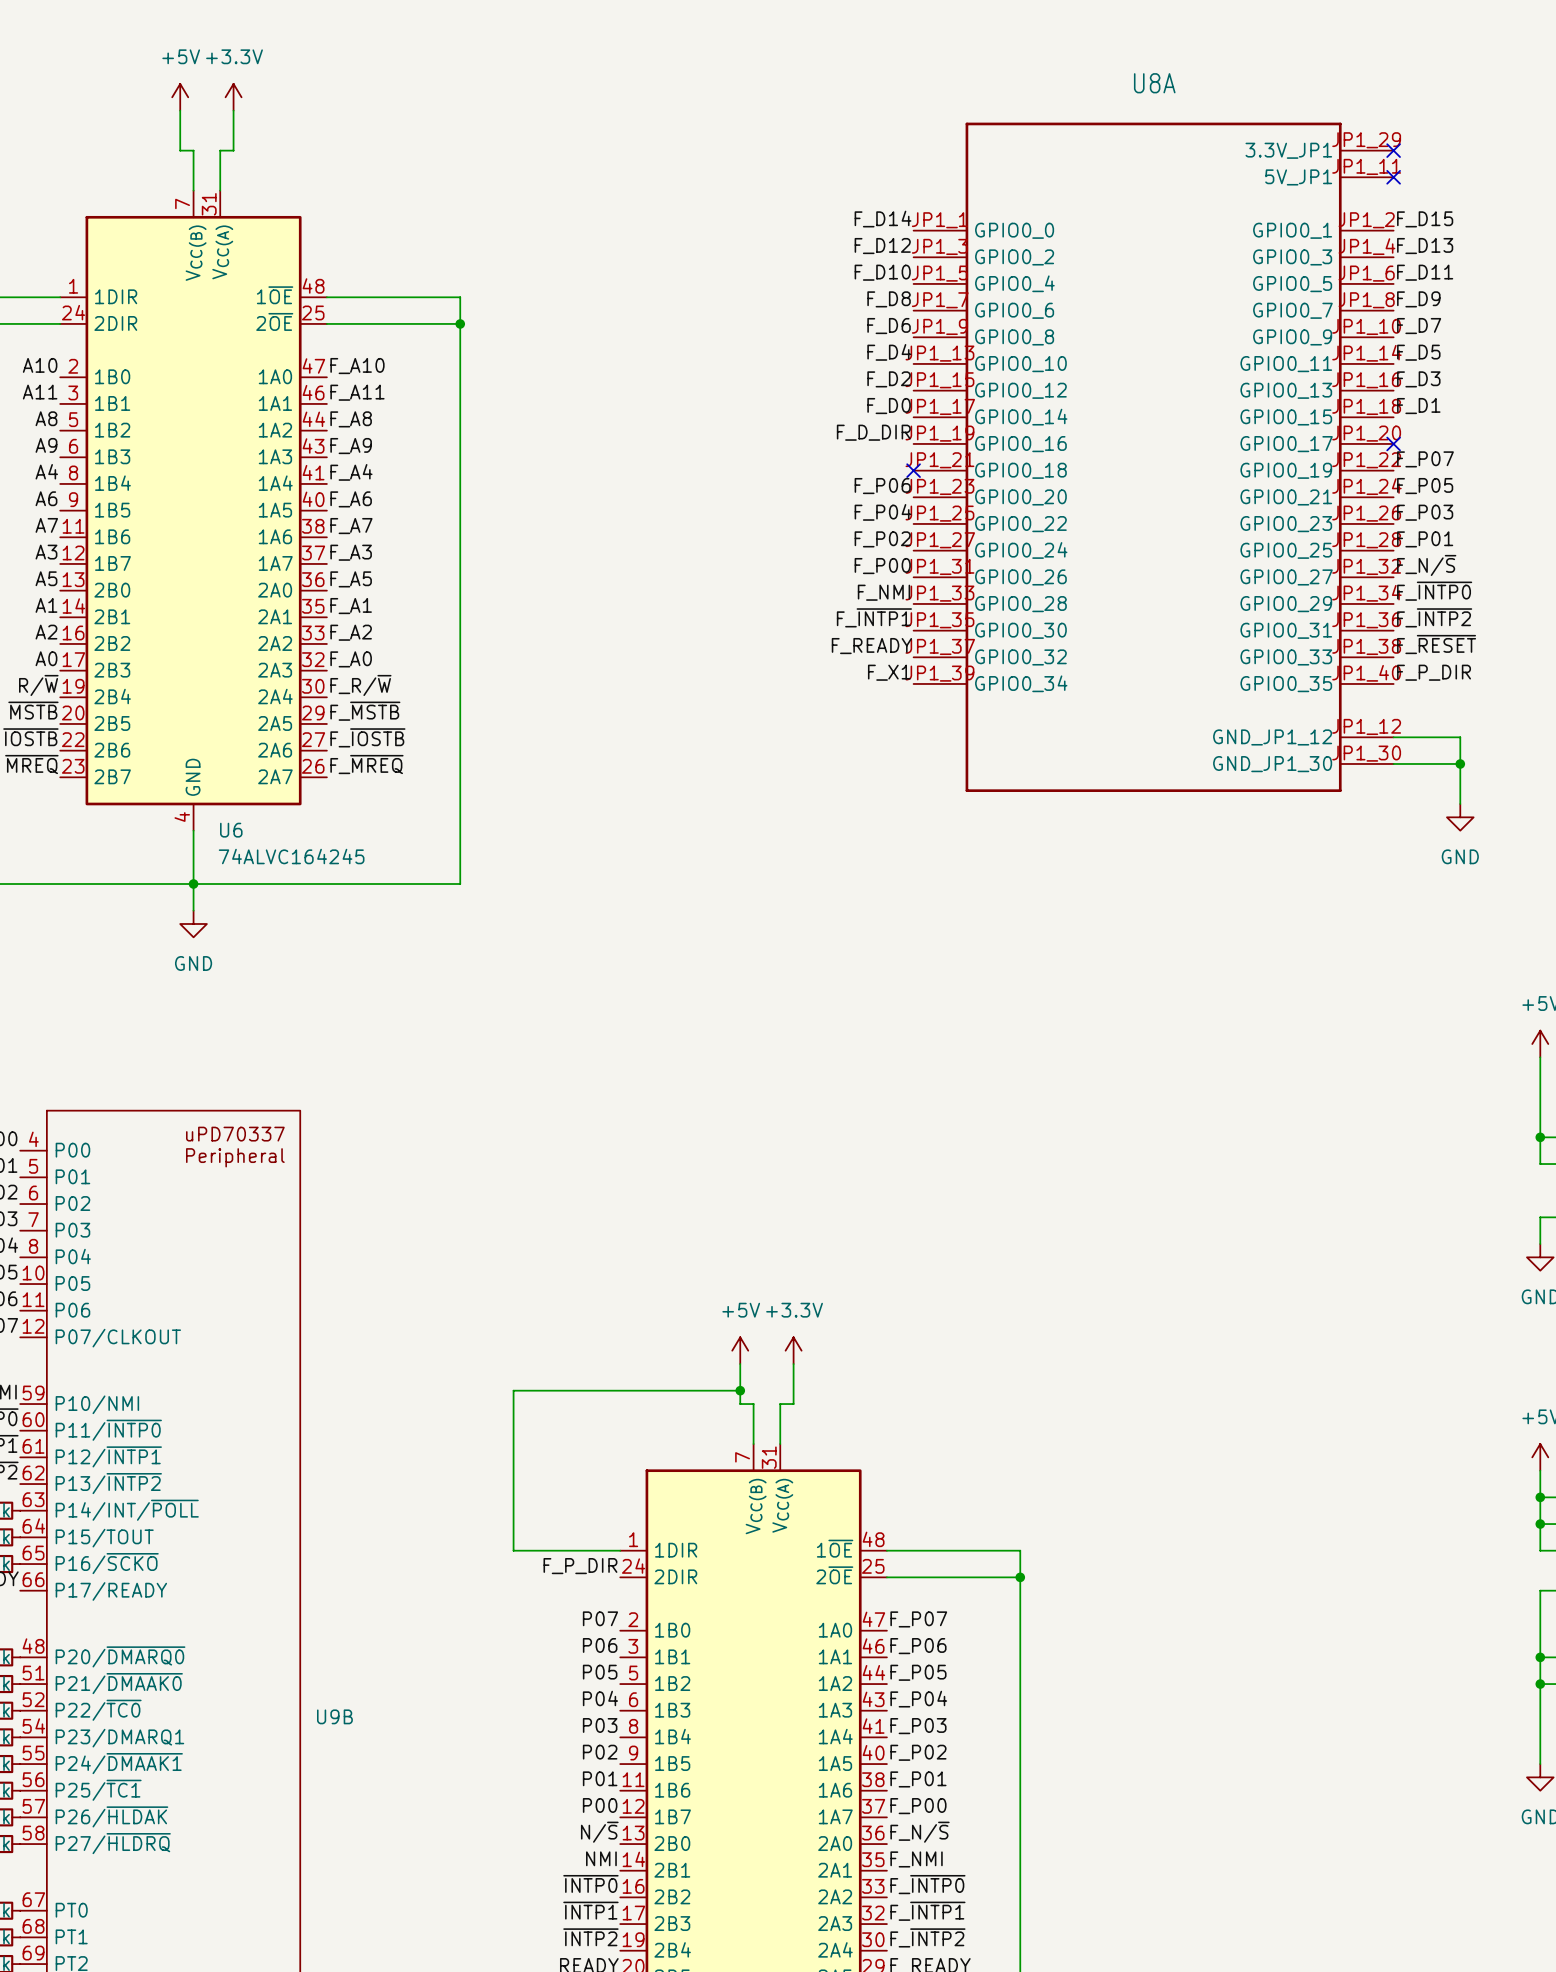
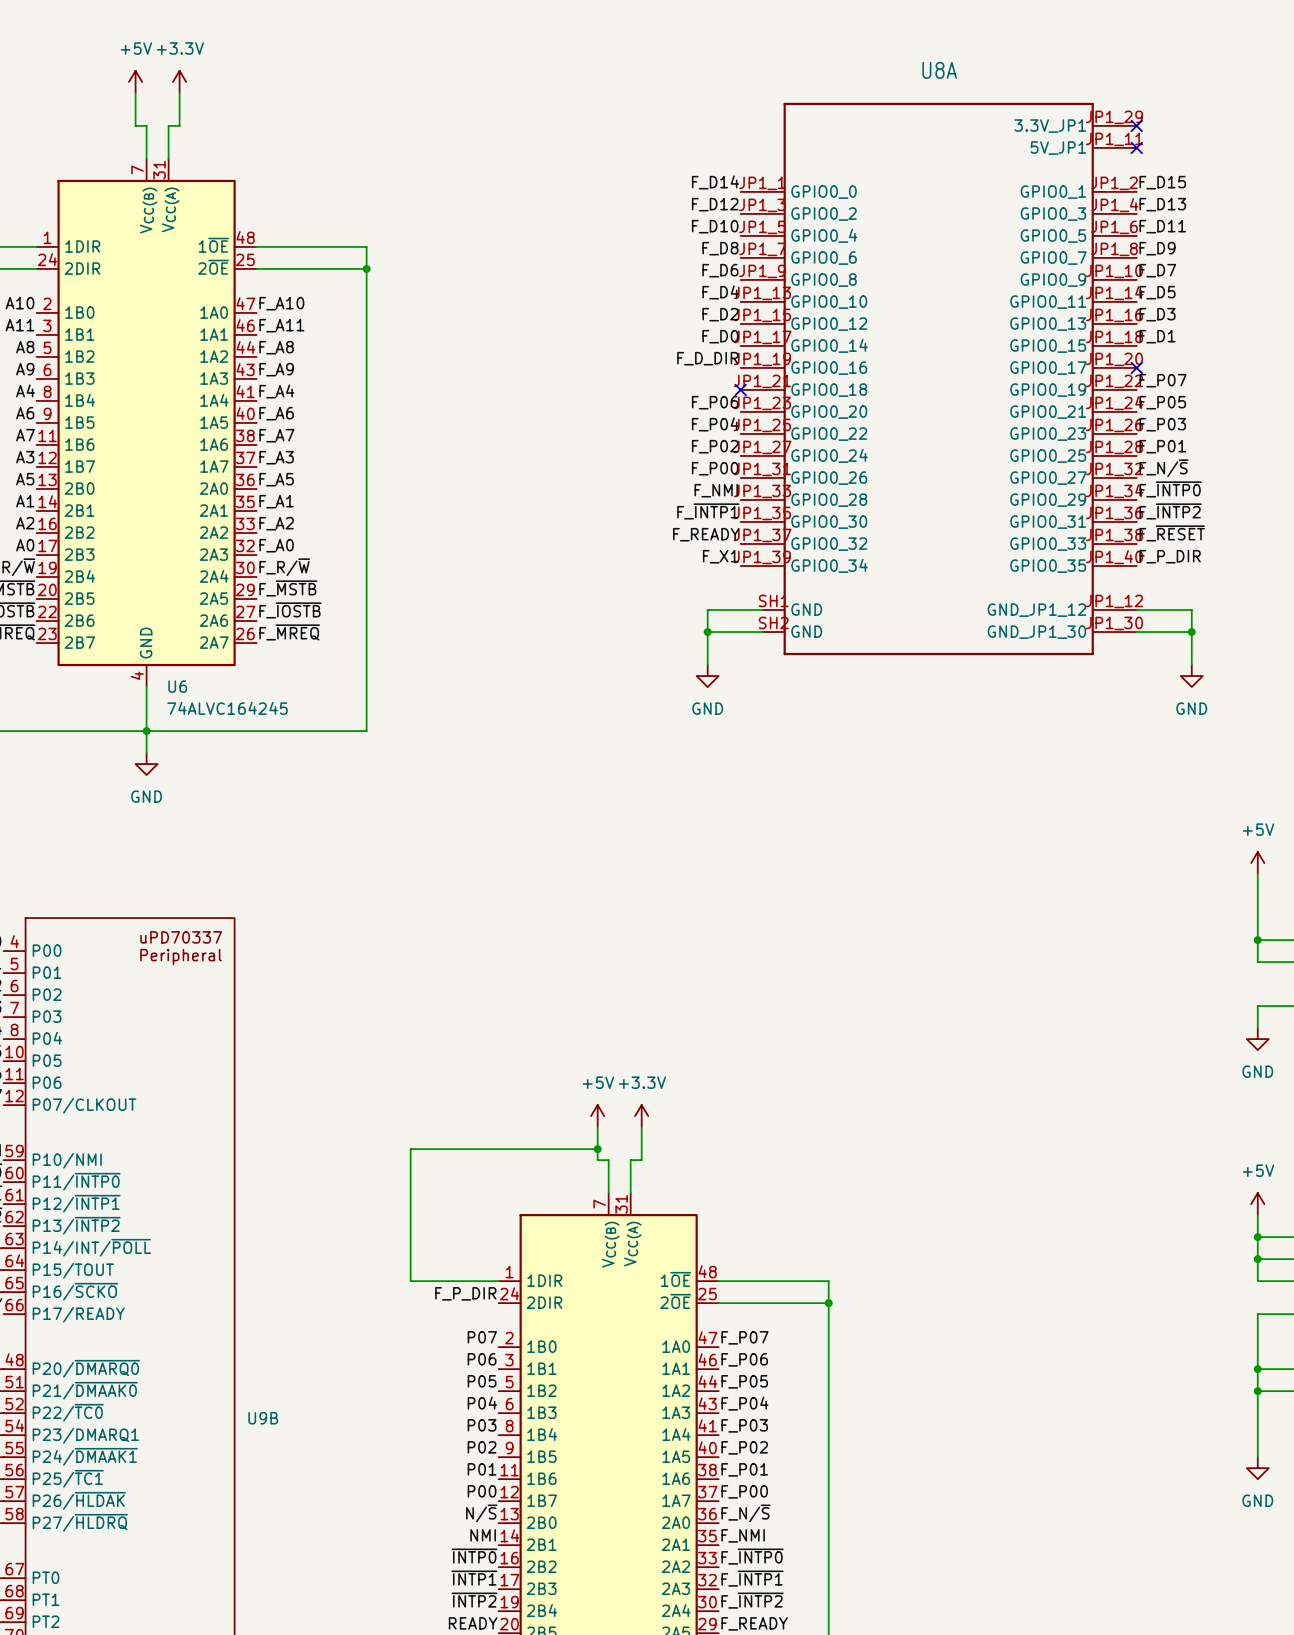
U8A symbol: [913, 122, 1394, 792] -> [740, 102, 1137, 656]
wire: none -> (762, 610) (707, 610) (707, 665)
wire: none -> (707, 632) (762, 632)
junction: none -> (707, 632)
power symbol: none -> GND (707, 676)

